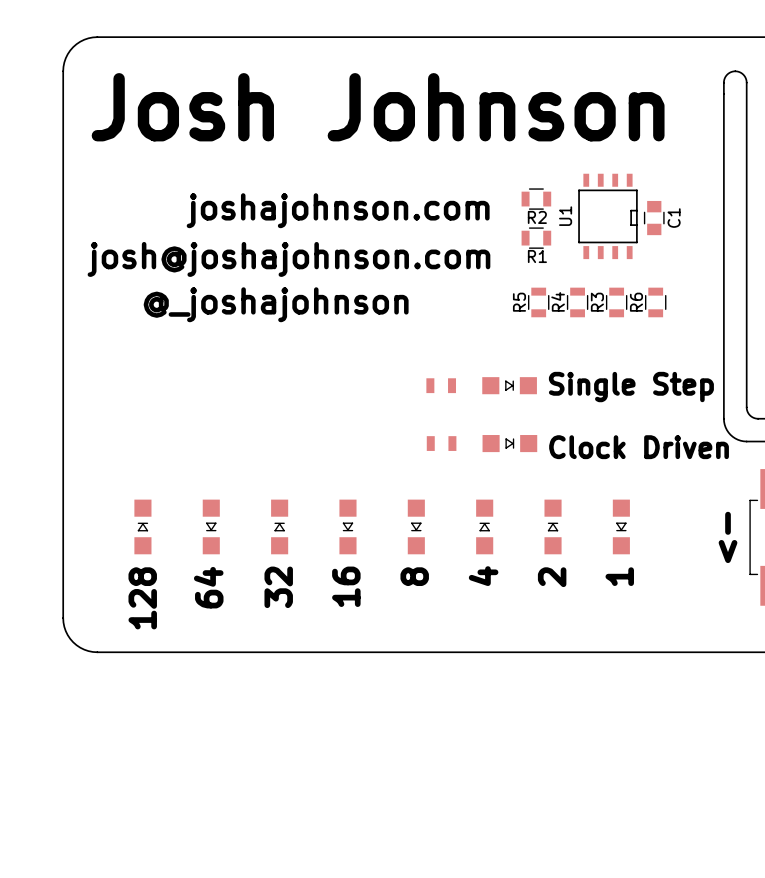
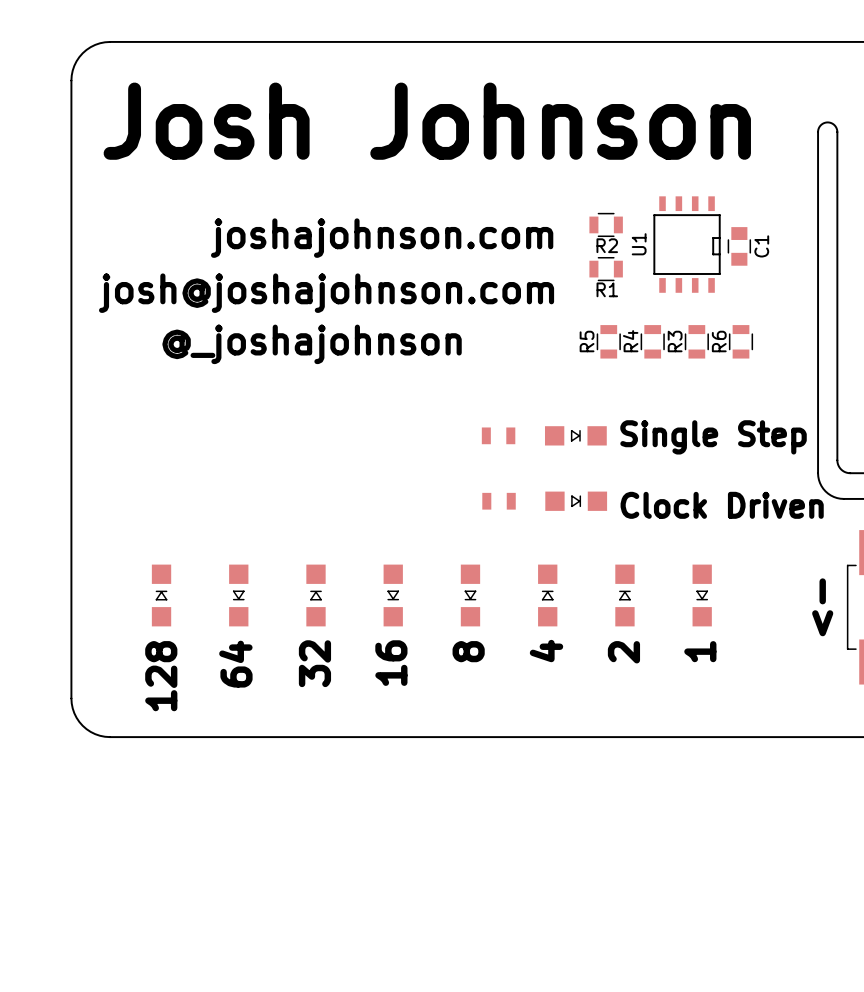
board edge: (723, 116) (724, 79) (729, 72) (738, 71) (744, 75) (746, 82) (746, 407) (750, 415) (758, 418) -> (818, 132) (820, 126) (826, 122) (833, 124) (837, 130) (837, 460) (839, 466) (843, 471) (856, 473)

